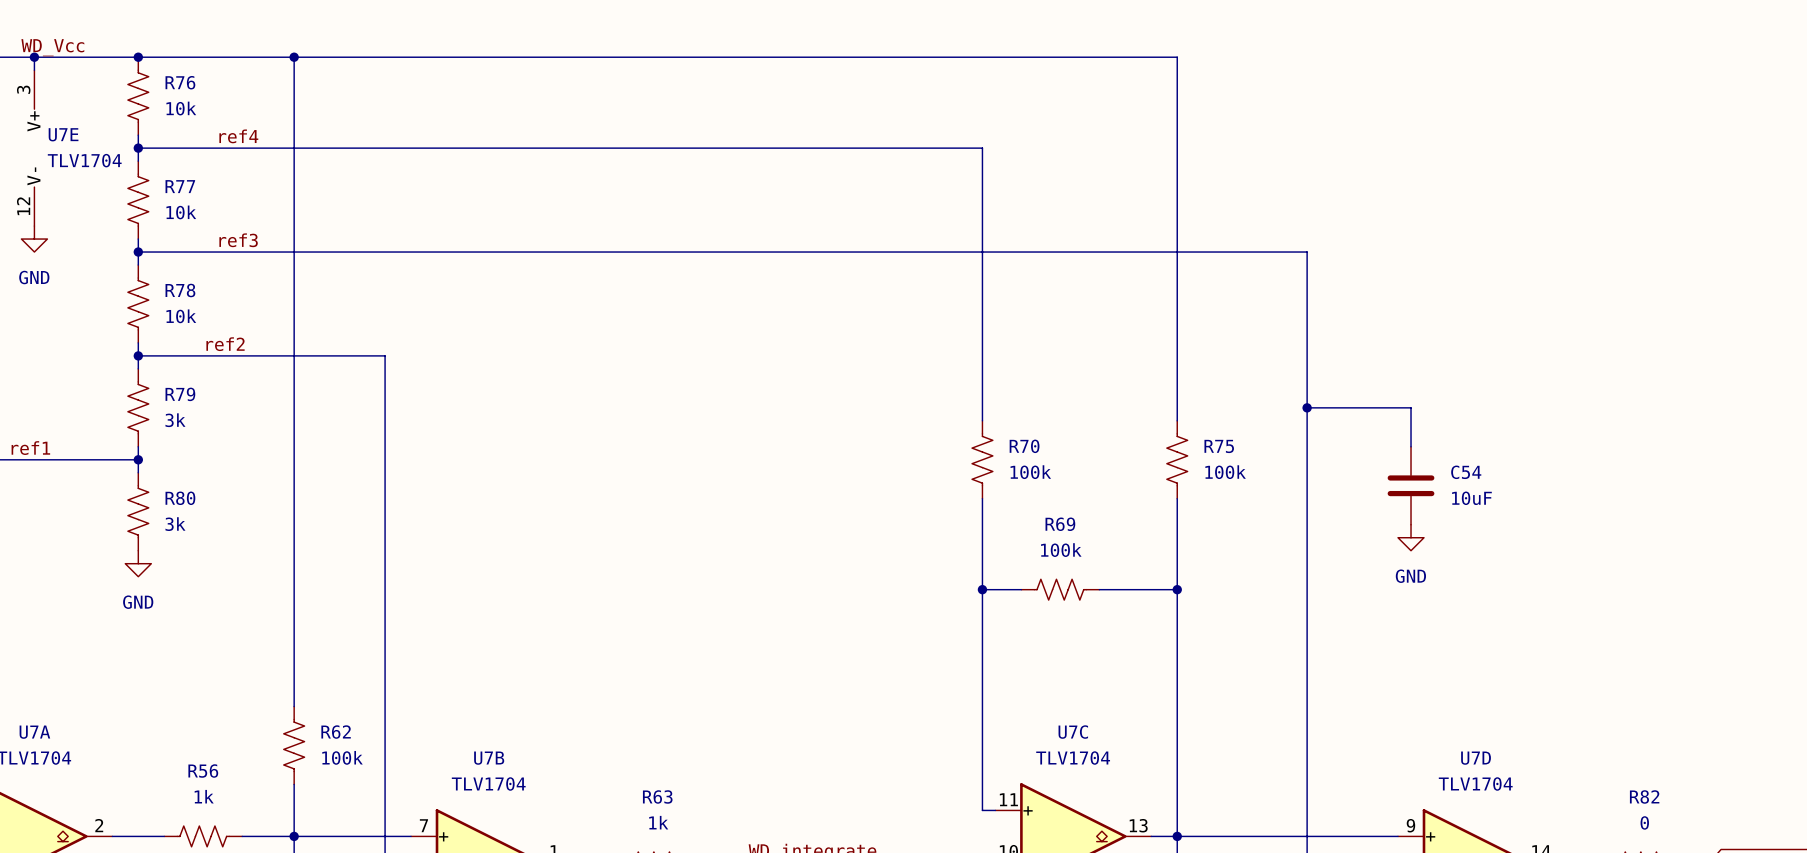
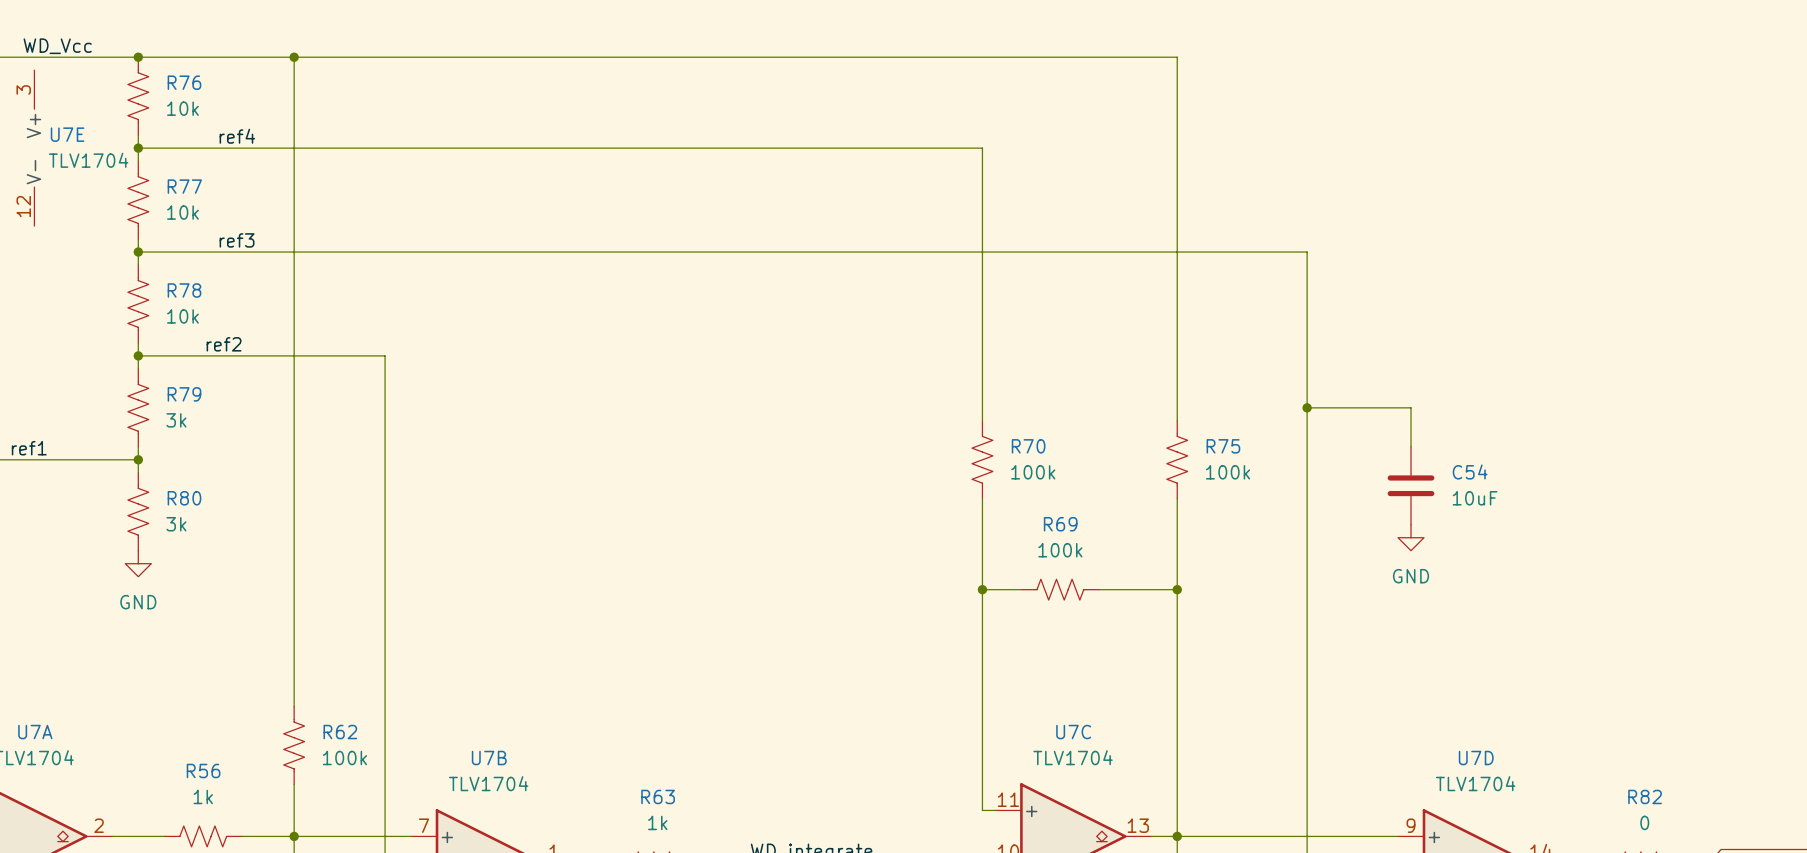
wire: (34, 57) (34, 70) -> none
junction: (34, 57) -> none
power symbol: GND (34, 239) -> none

